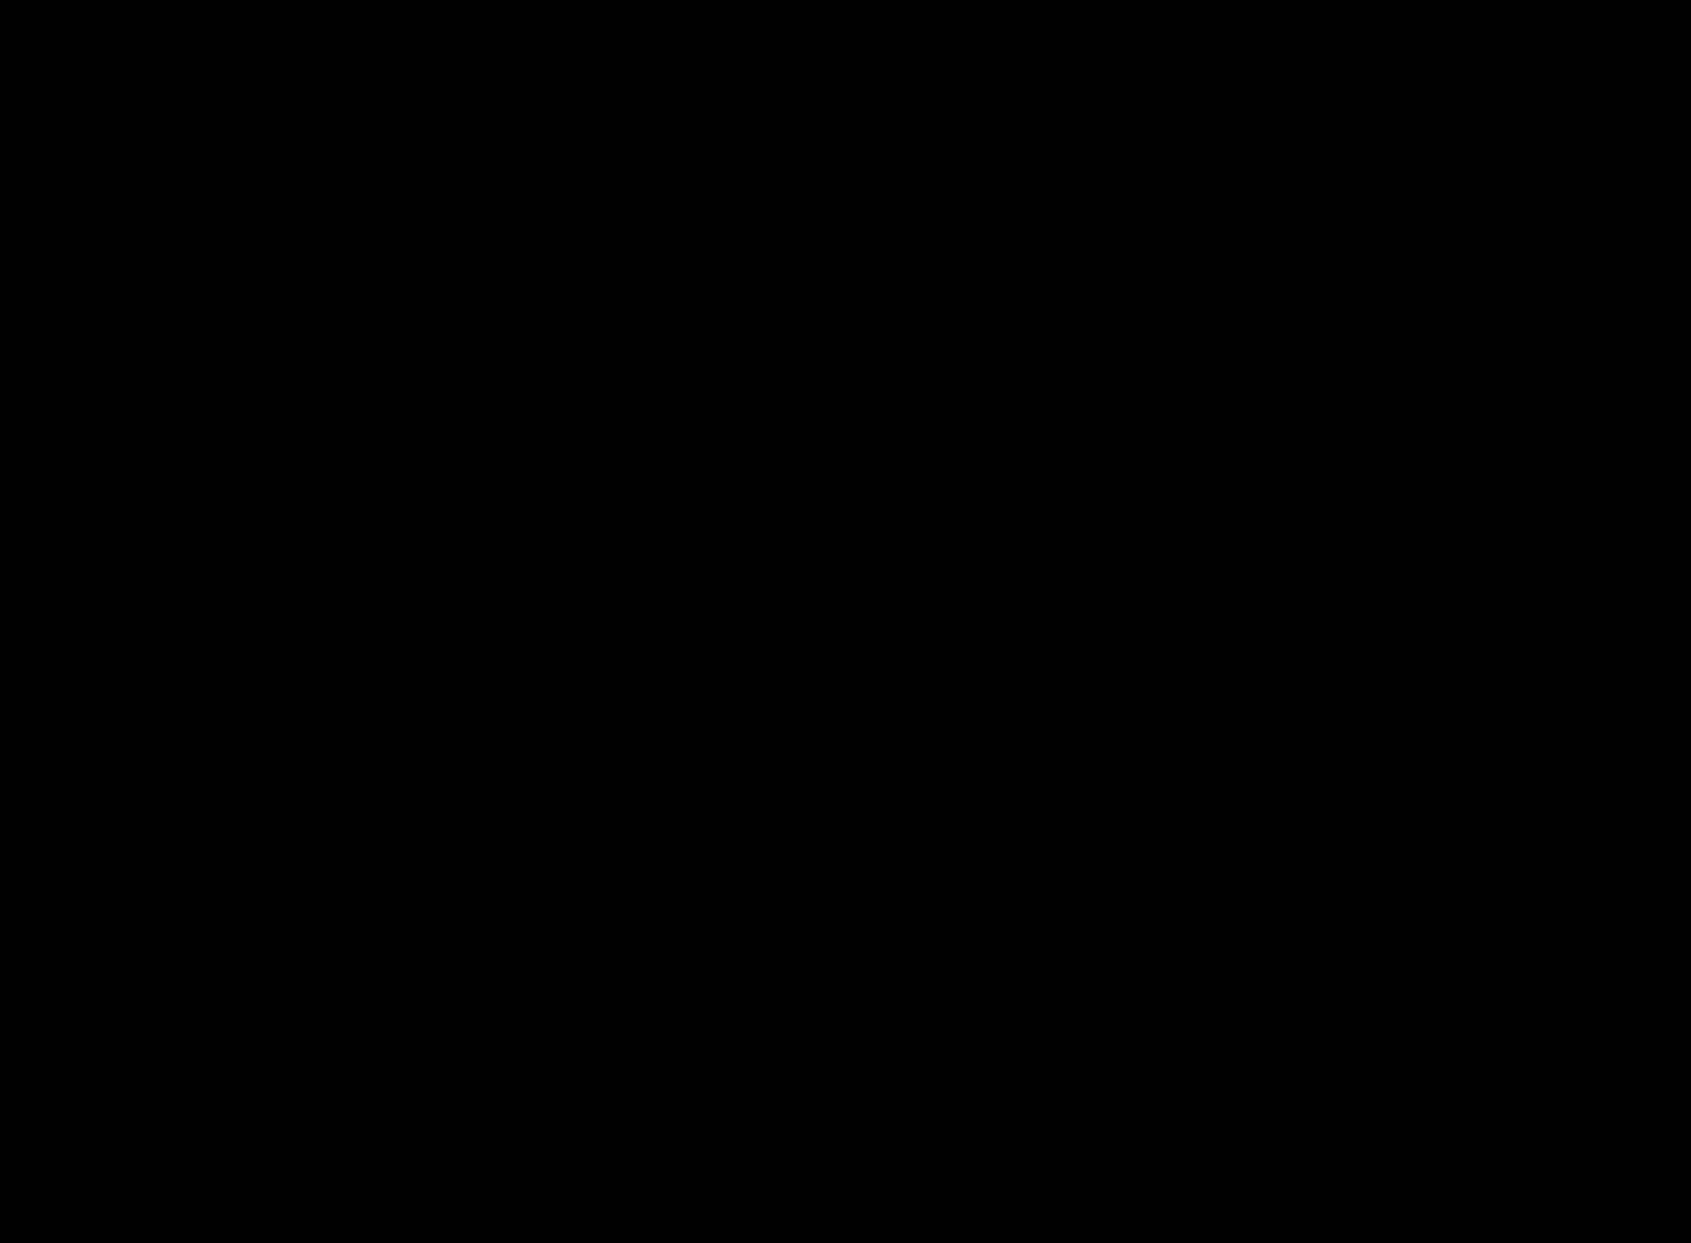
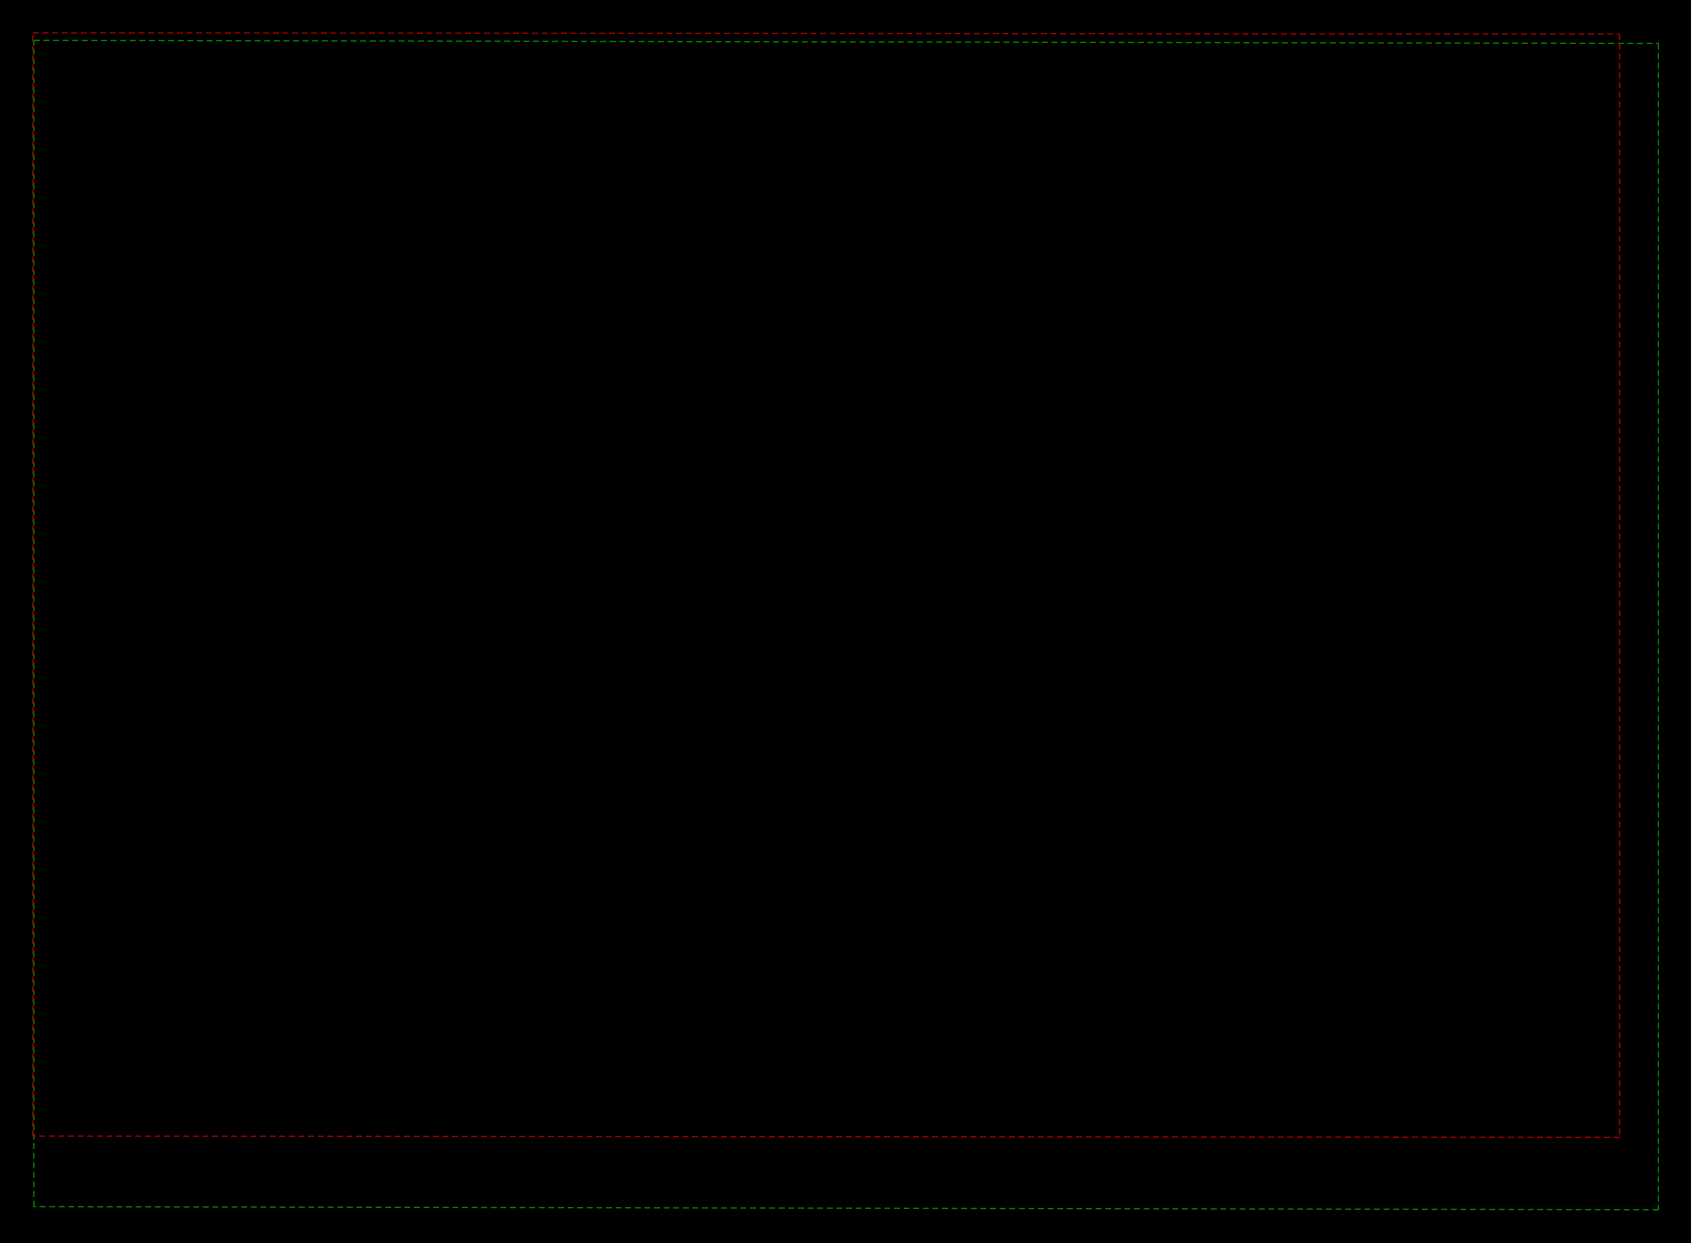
top zone outline: none -> (32, 32) (1619, 34) (1619, 1137) (32, 1136) (32, 32)
bottom zone outline: none -> (33, 40) (33, 1206) (1658, 1209) (1658, 43) (33, 40)

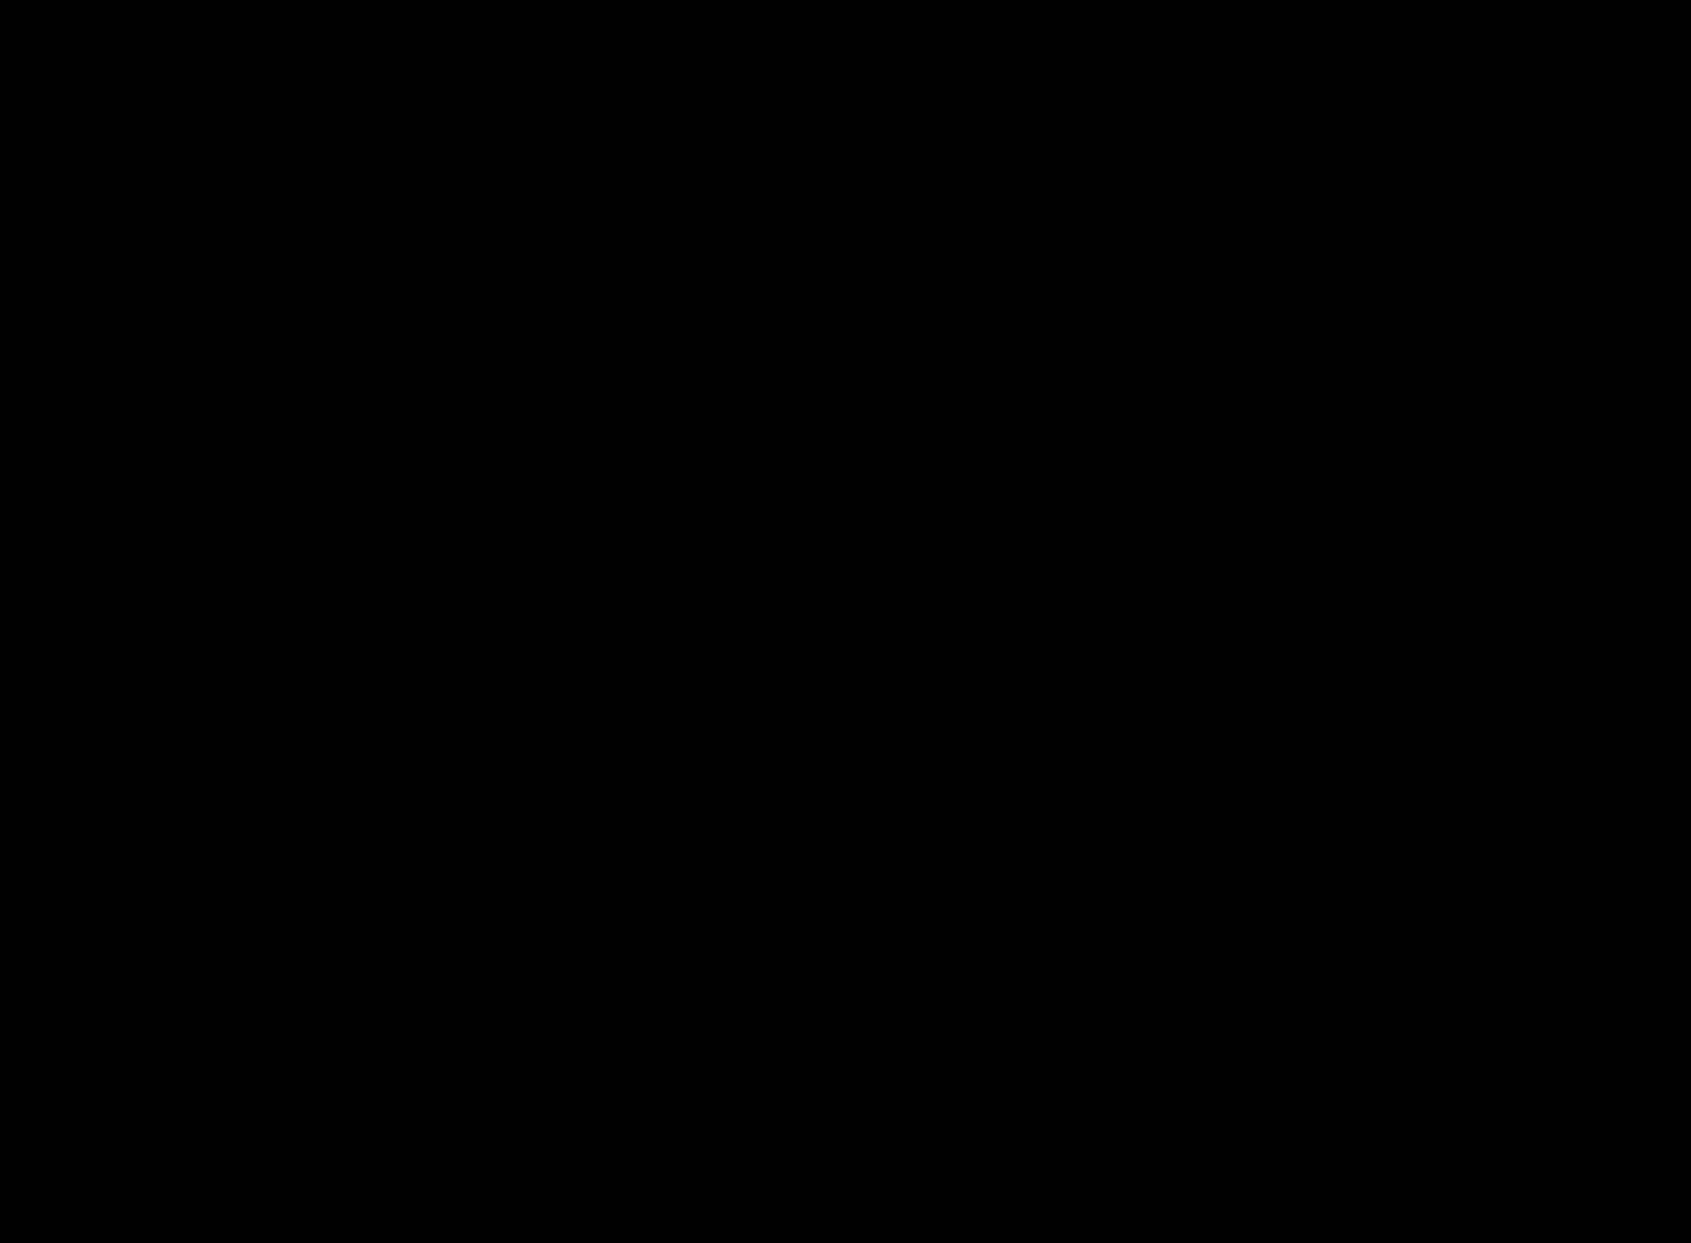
top zone outline: (32, 32) (1619, 34) (1619, 1137) (32, 1136) (32, 32) -> none
bottom zone outline: (33, 40) (33, 1206) (1658, 1209) (1658, 43) (33, 40) -> none

